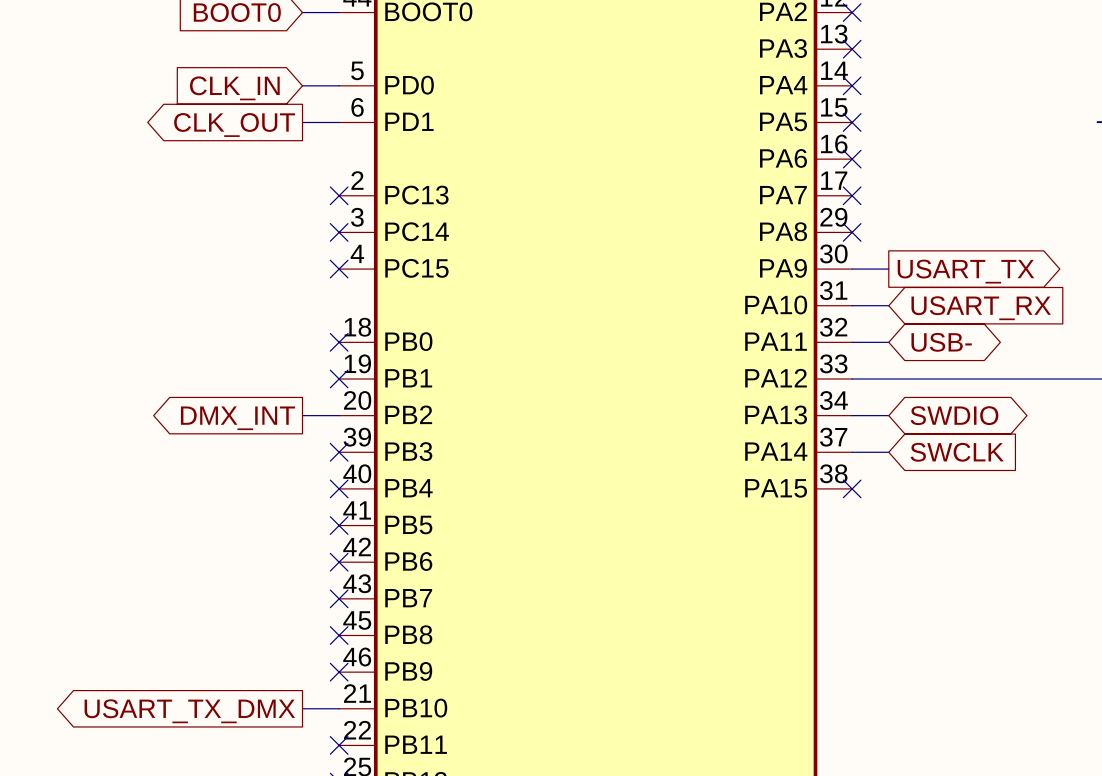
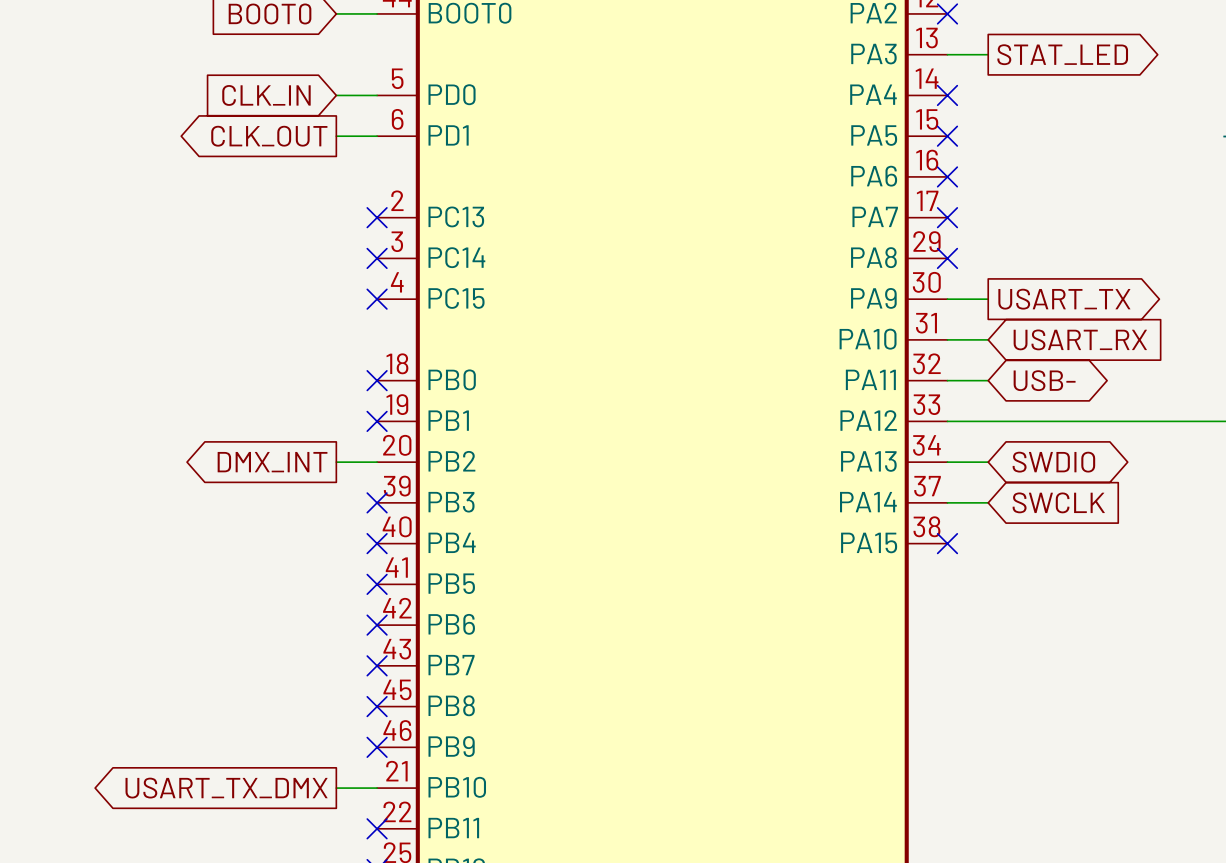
wire: none -> (947, 54) (988, 54)
no-connect mark: (852, 49) -> none
global label: none -> STAT_LED (1062, 54)

